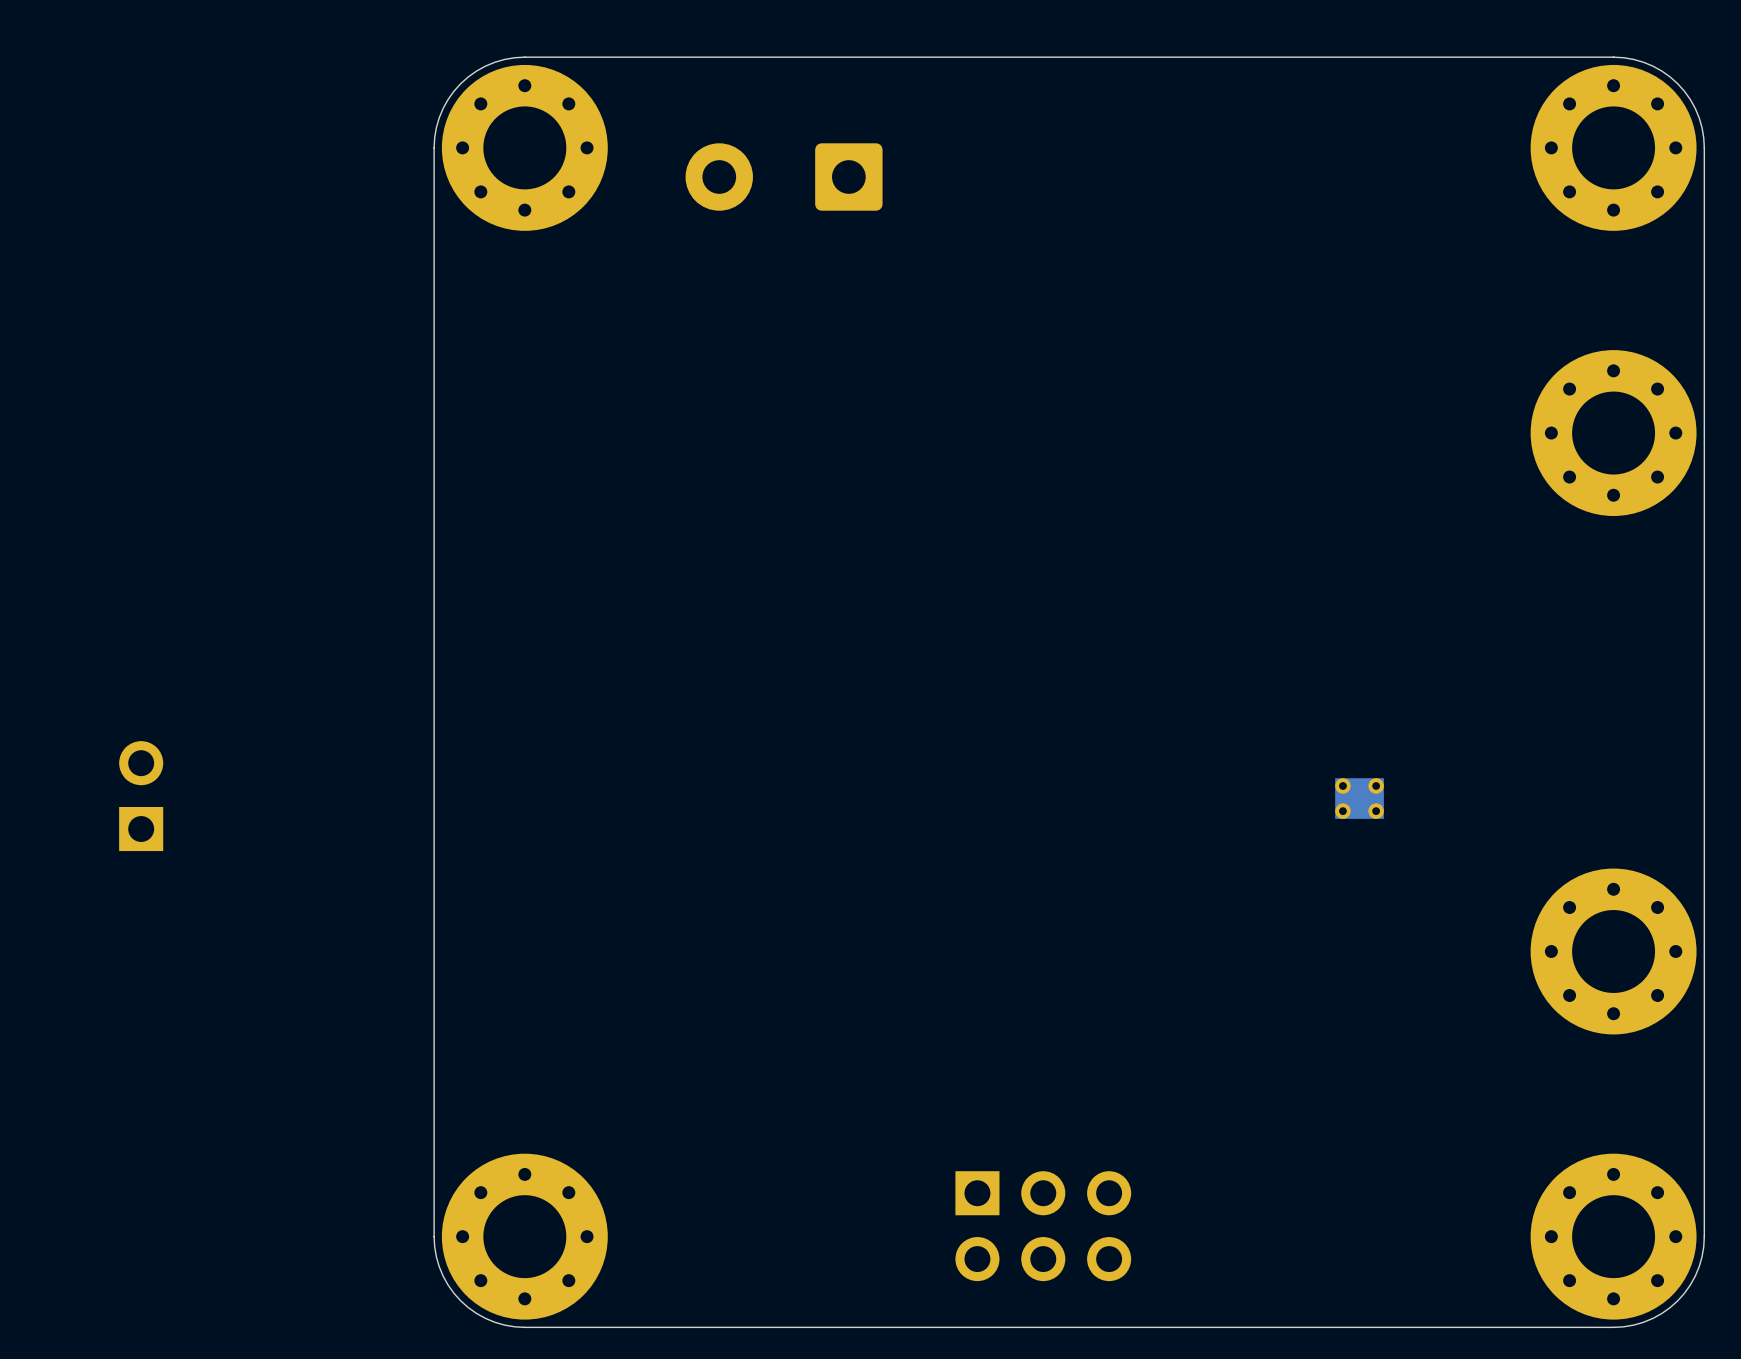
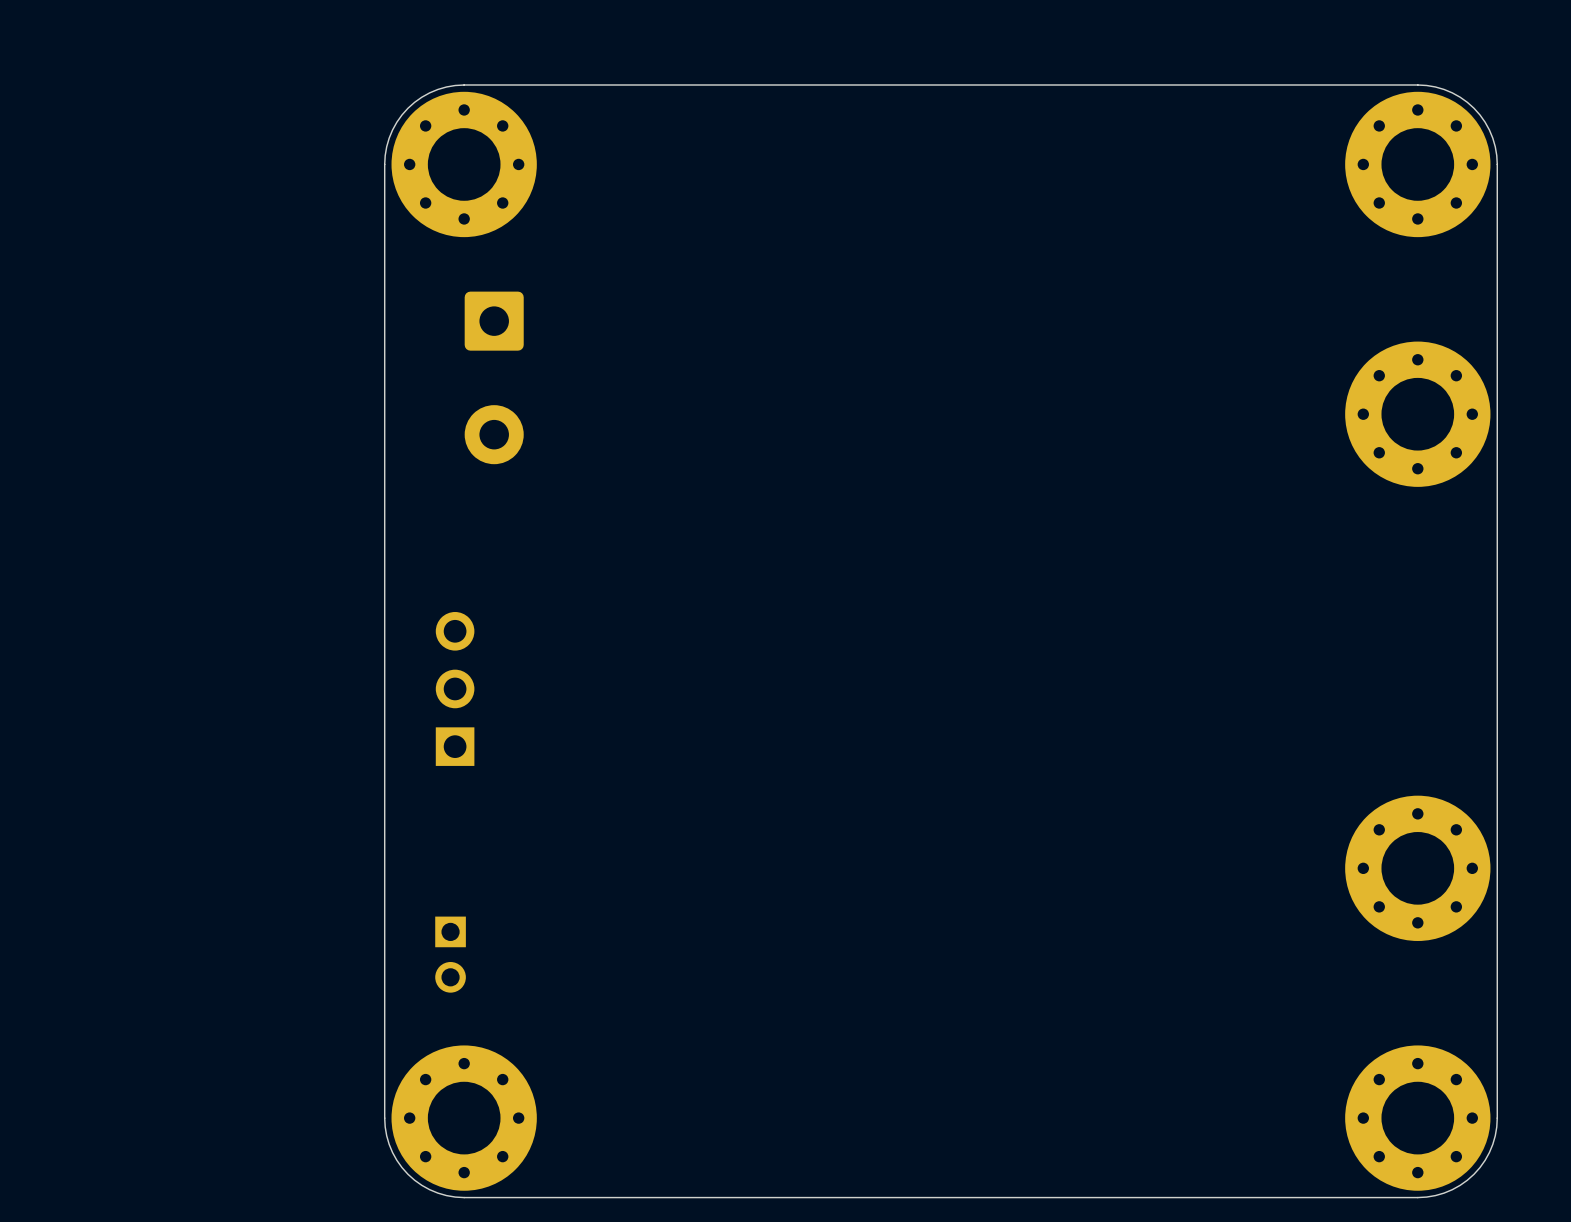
part rotation: 0° (784, 177) -> 90° counterclockwise (494, 377)
part position: (784, 177) -> (494, 377)
part: none -> (455, 688)
part: (141, 796) -> none
part: (1359, 798) -> none
part: none -> (450, 954)
part: (1043, 1226) -> none

